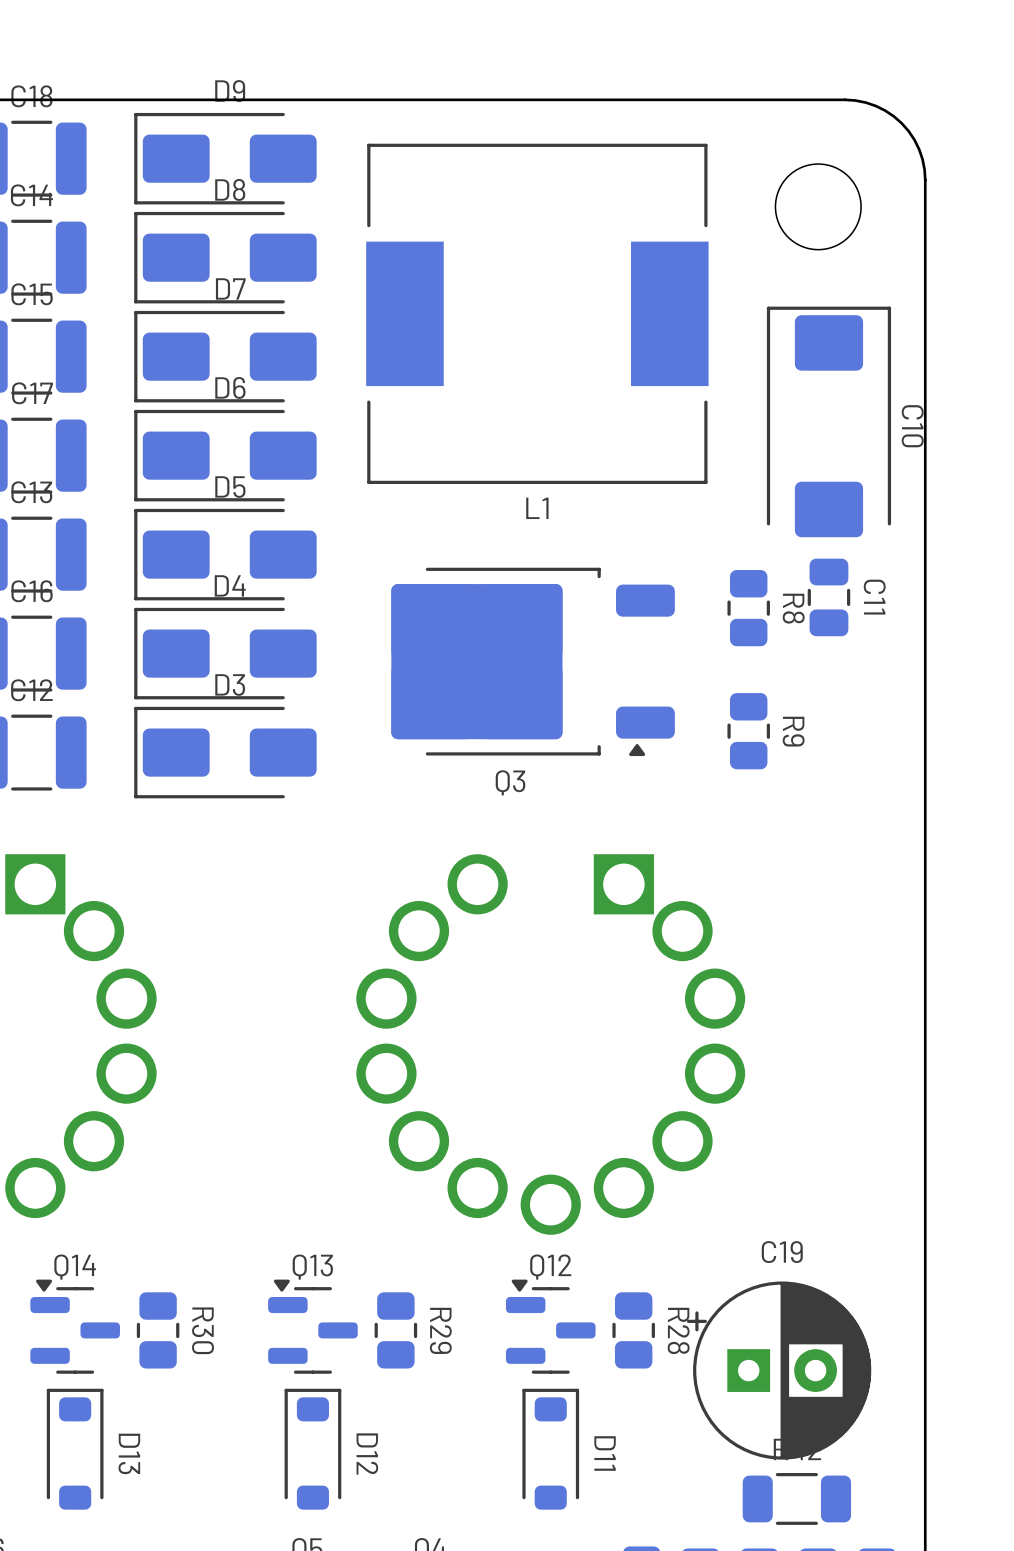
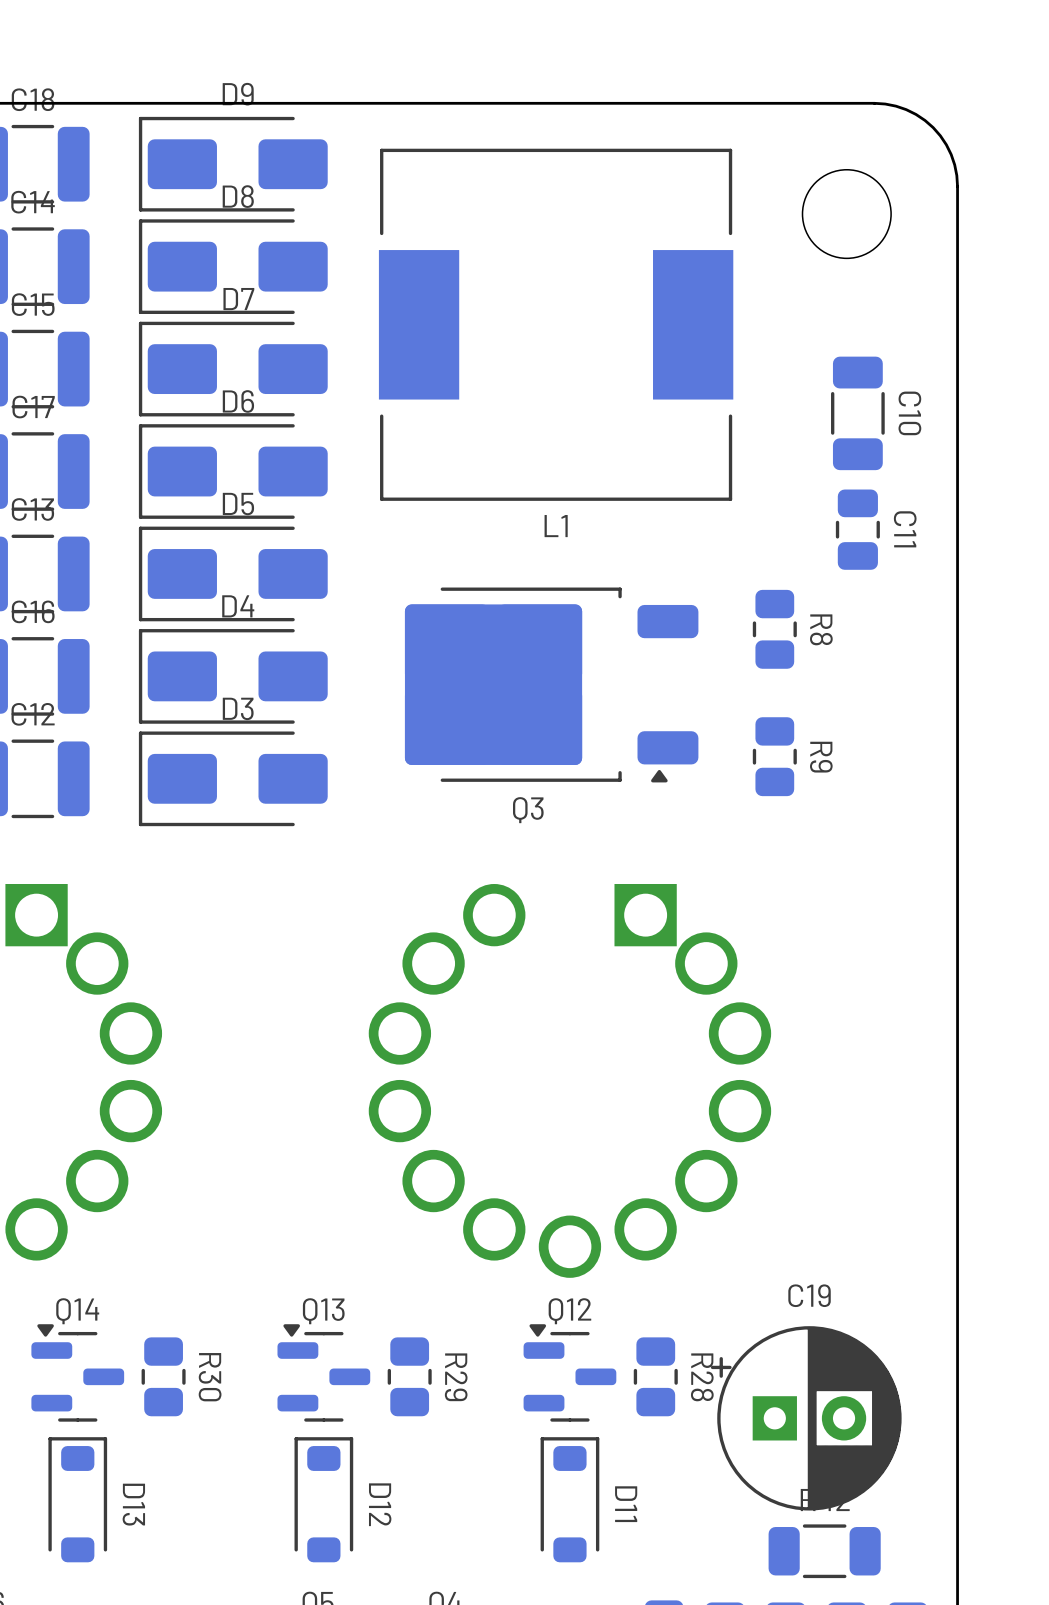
C10 footprint: [766, 306, 892, 538] -> [831, 356, 885, 471]
C11 position: (828, 597) -> (857, 529)

